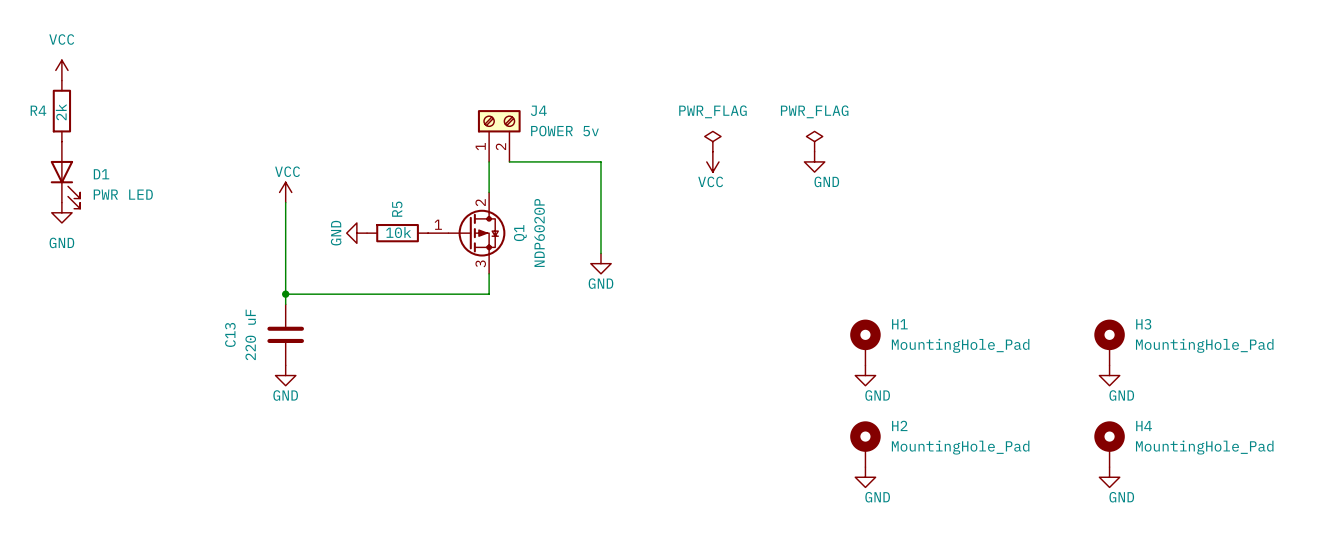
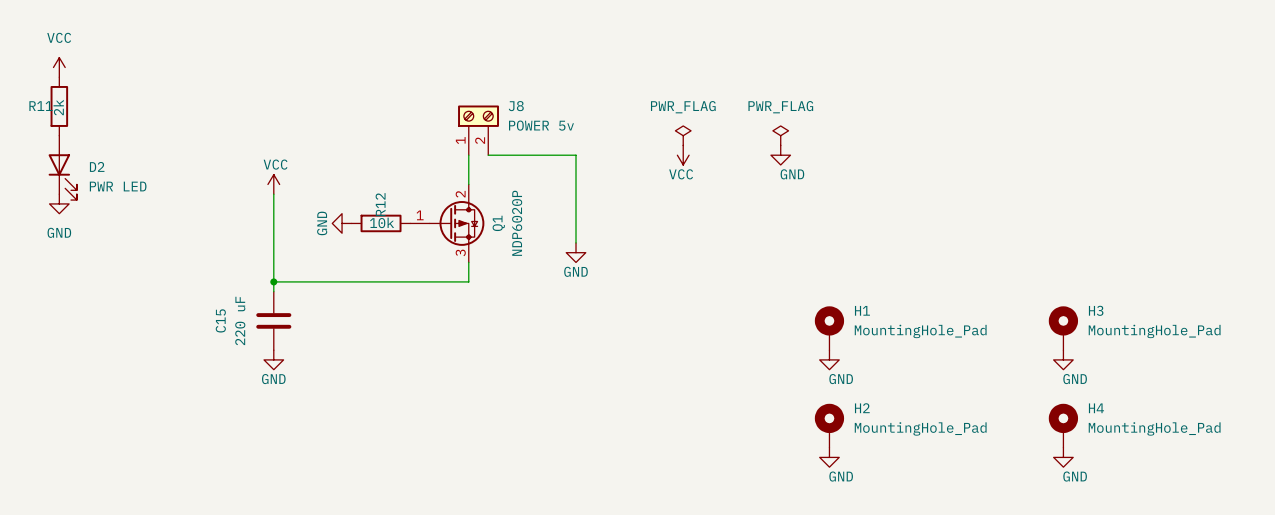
R4 name: R4 (38, 110) -> R11 (41, 106)
J4 name: J4 (538, 110) -> J8 (516, 106)
D1 name: D1 (101, 174) -> D2 (97, 166)
R5 name: R5 (397, 209) -> R12 (380, 204)
C13 name: C13 (230, 334) -> C15 (220, 320)

